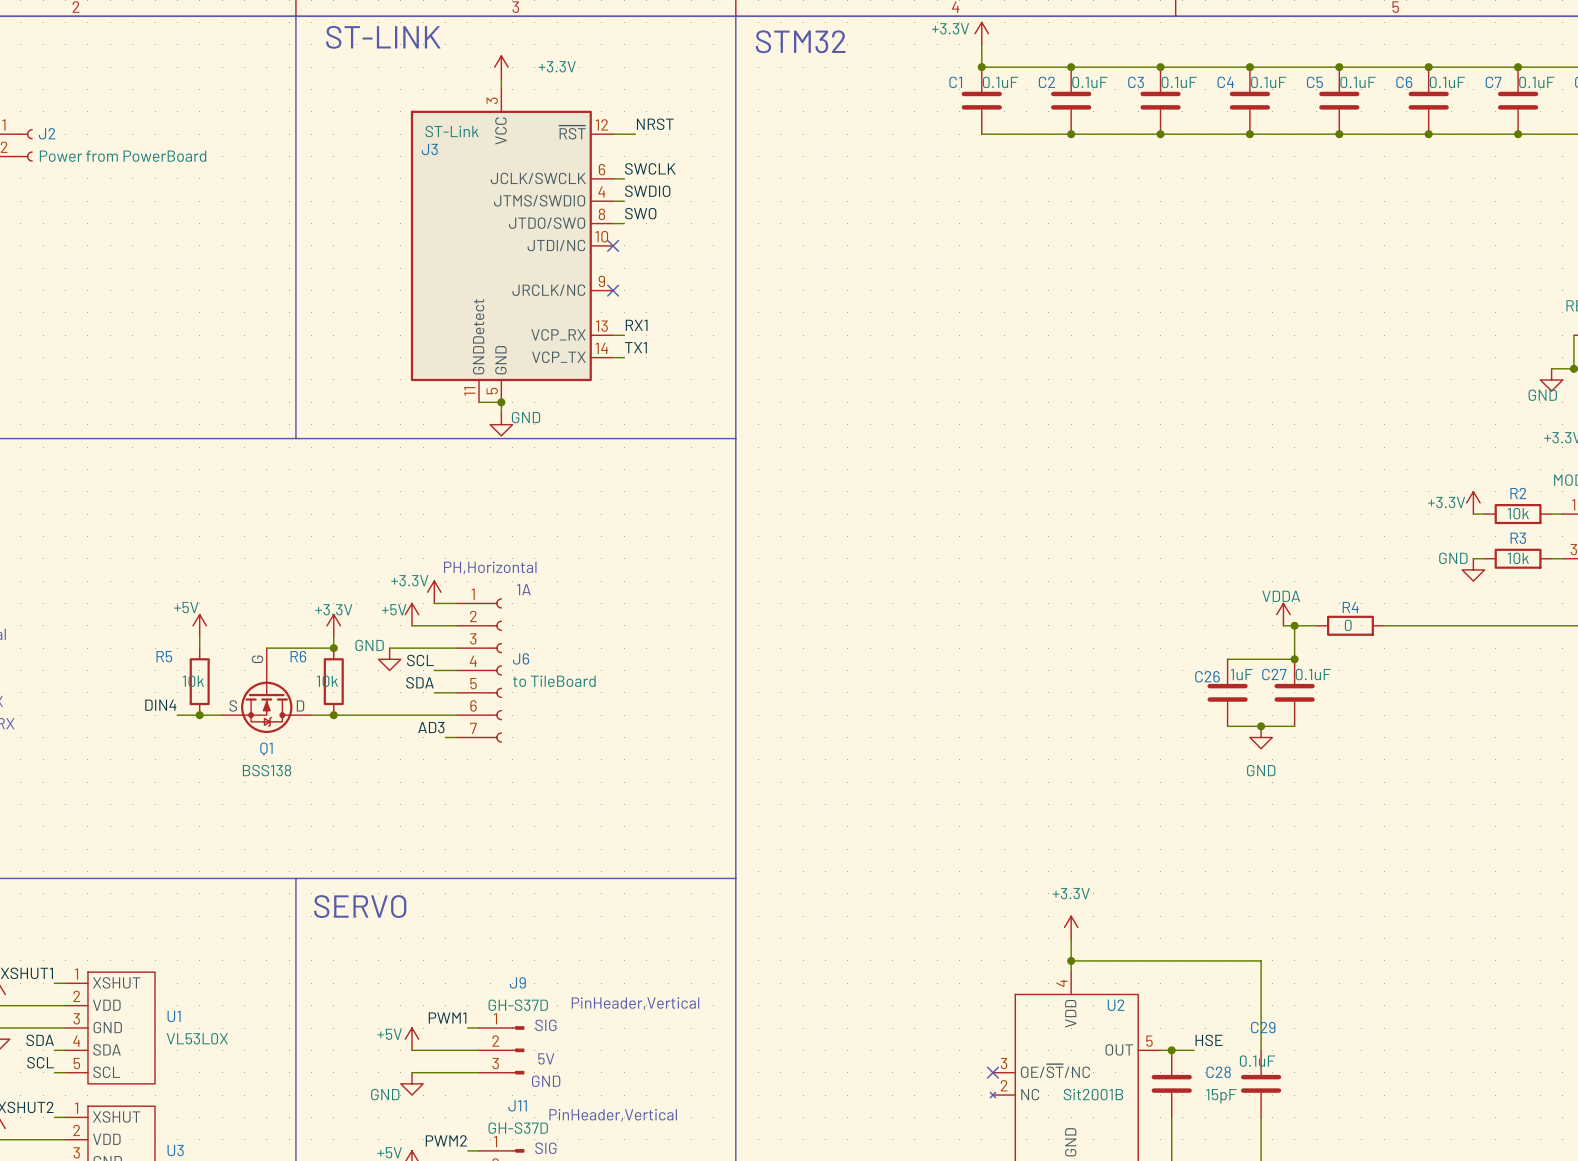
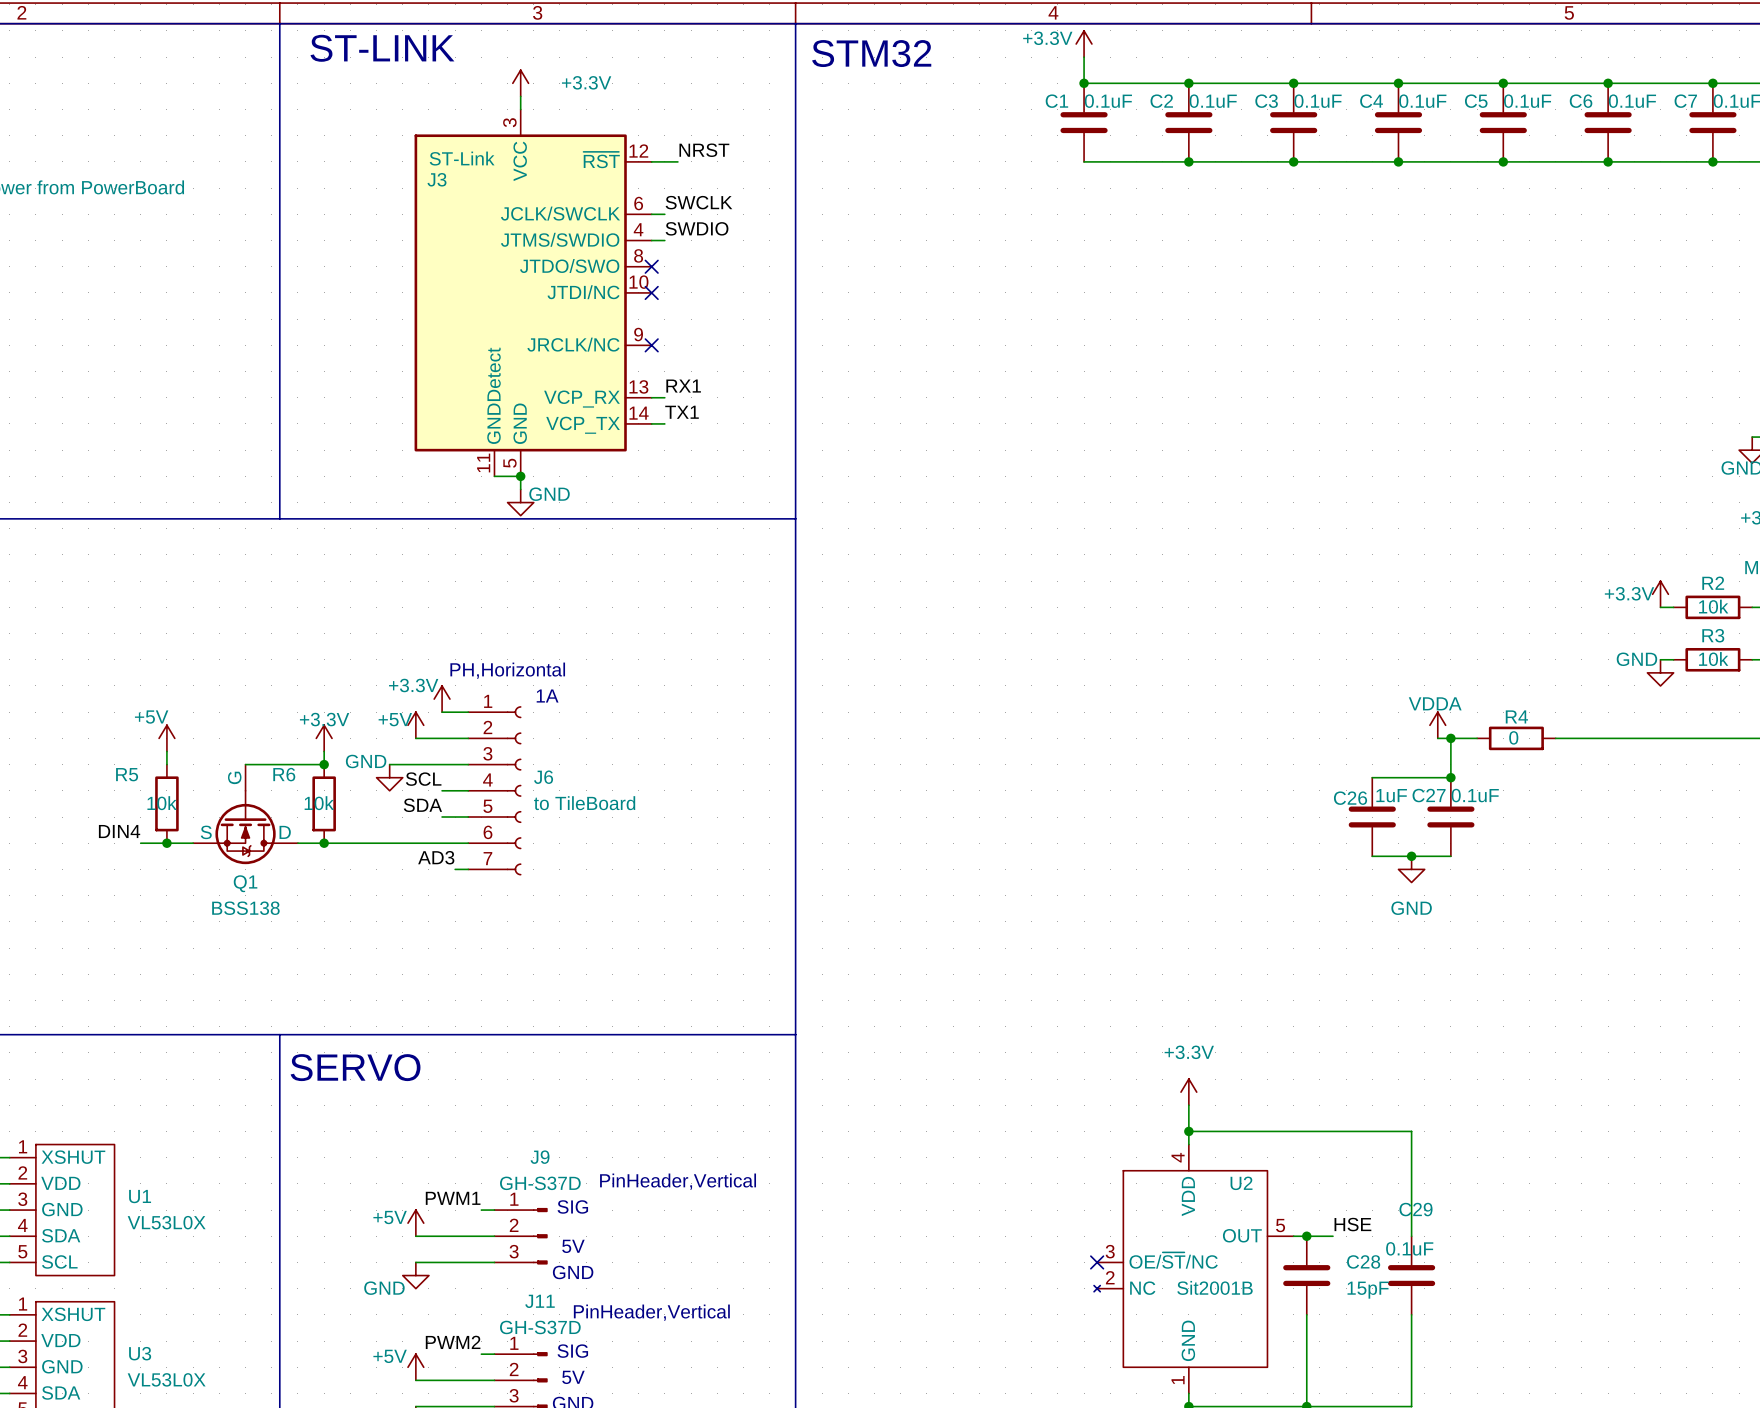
label: SWO (640, 213) -> none
wire: (613, 223) (624, 223) -> none
no-connect mark: none -> (651, 266)

